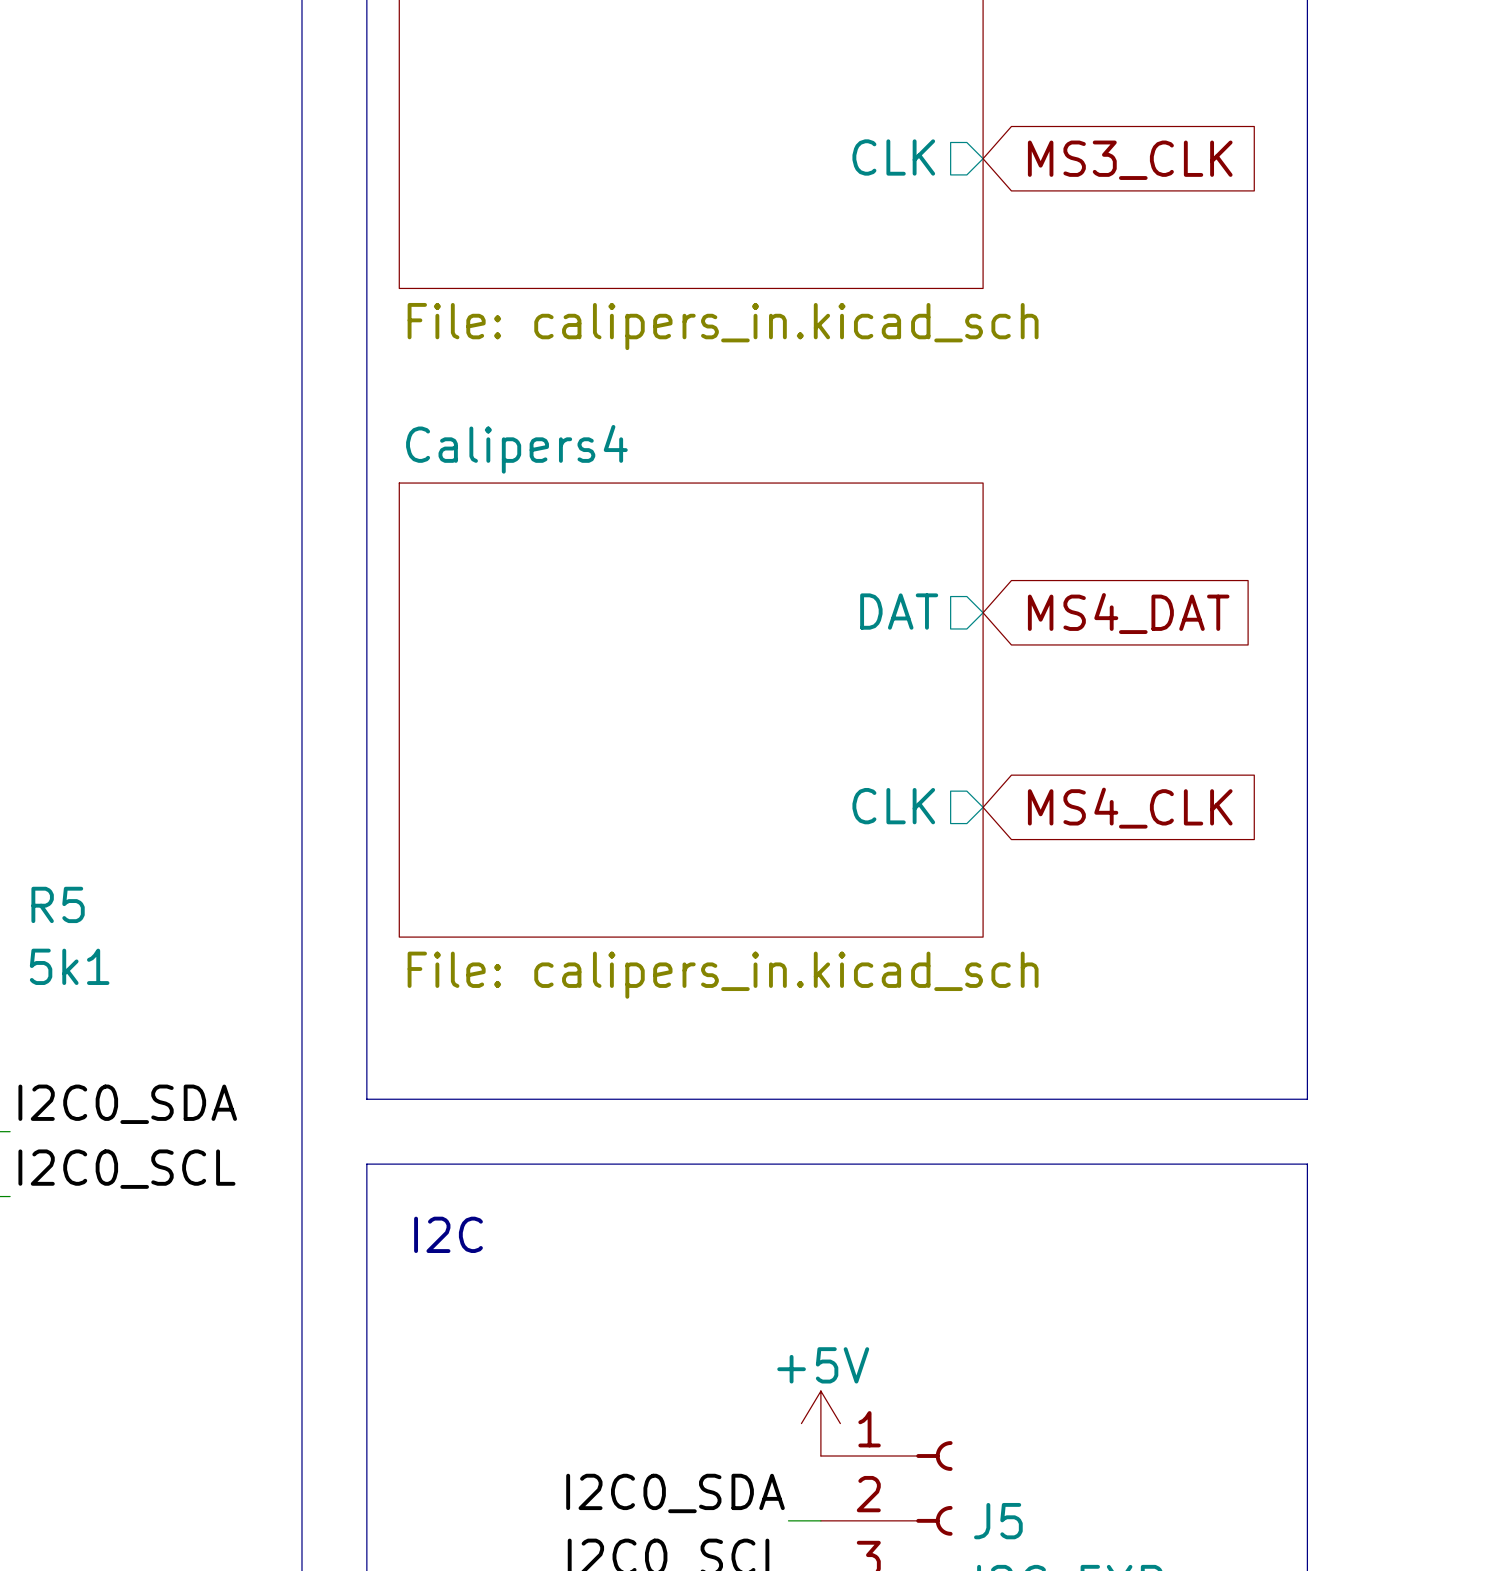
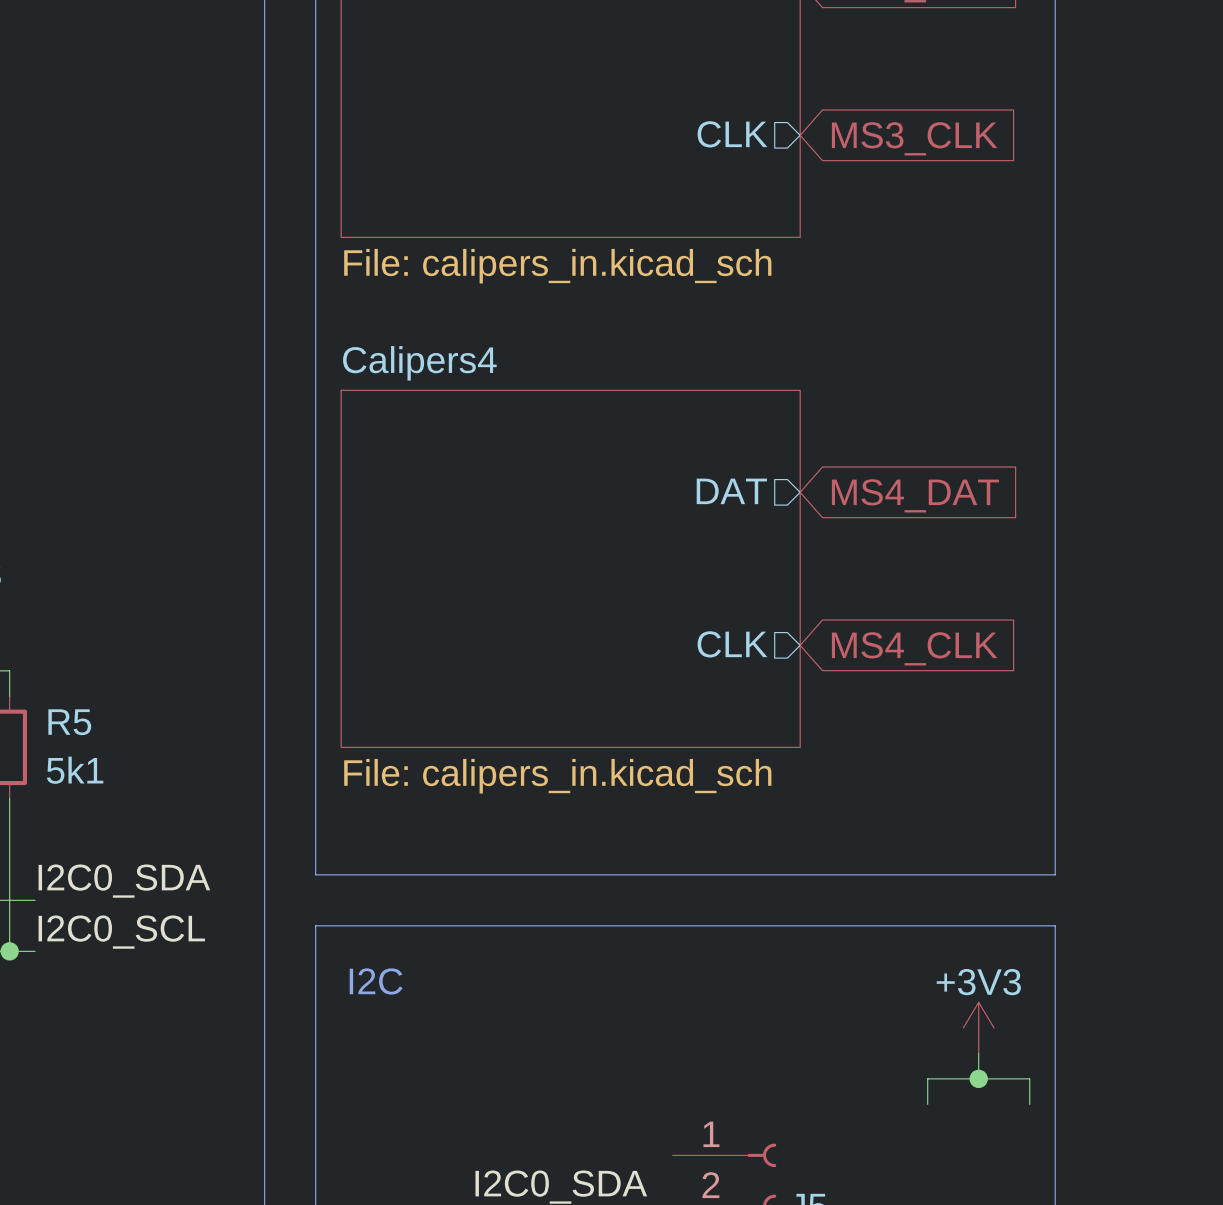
power symbol: none -> +3V3 (978, 1027)
wire: none -> (978, 1053) (978, 1078)
junction: none -> (978, 1078)
wire: none -> (927, 1104) (927, 1078) (1029, 1078) (1029, 1104)
power symbol: +5V (820, 1423) -> none

